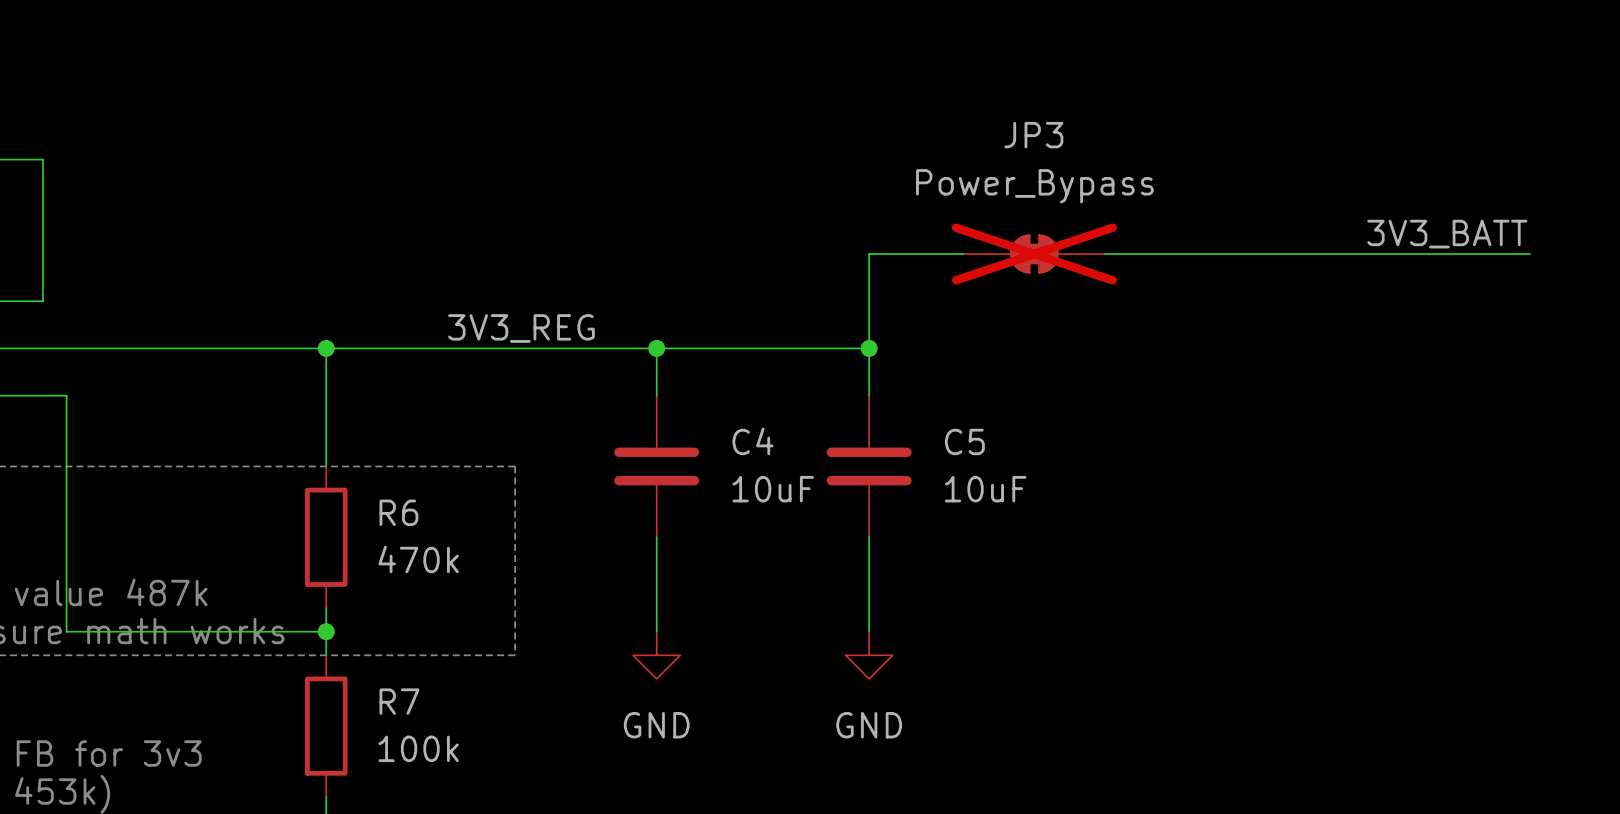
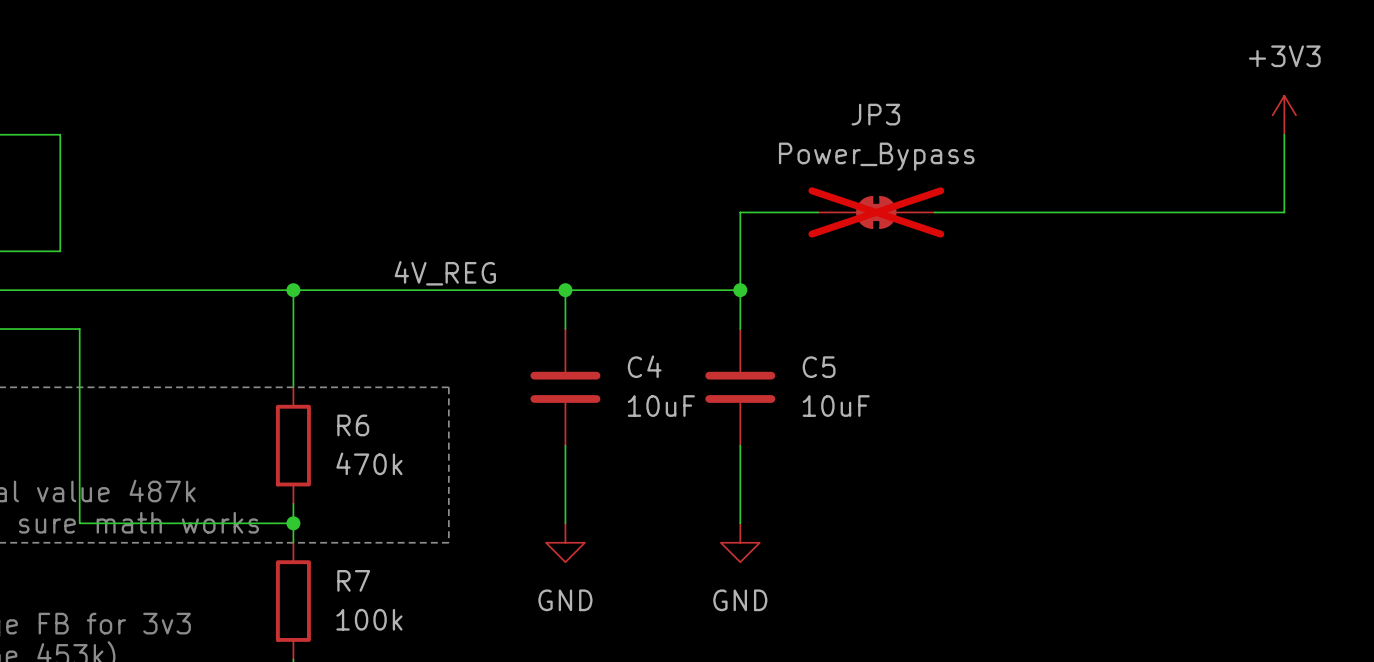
power symbol: none -> +3V3 (1284, 115)
wire: none -> (1284, 134) (1284, 212)
label: 3V3_BATT (1447, 234) -> none
label: 3V3_REG (521, 328) -> 4V_REG (445, 273)

